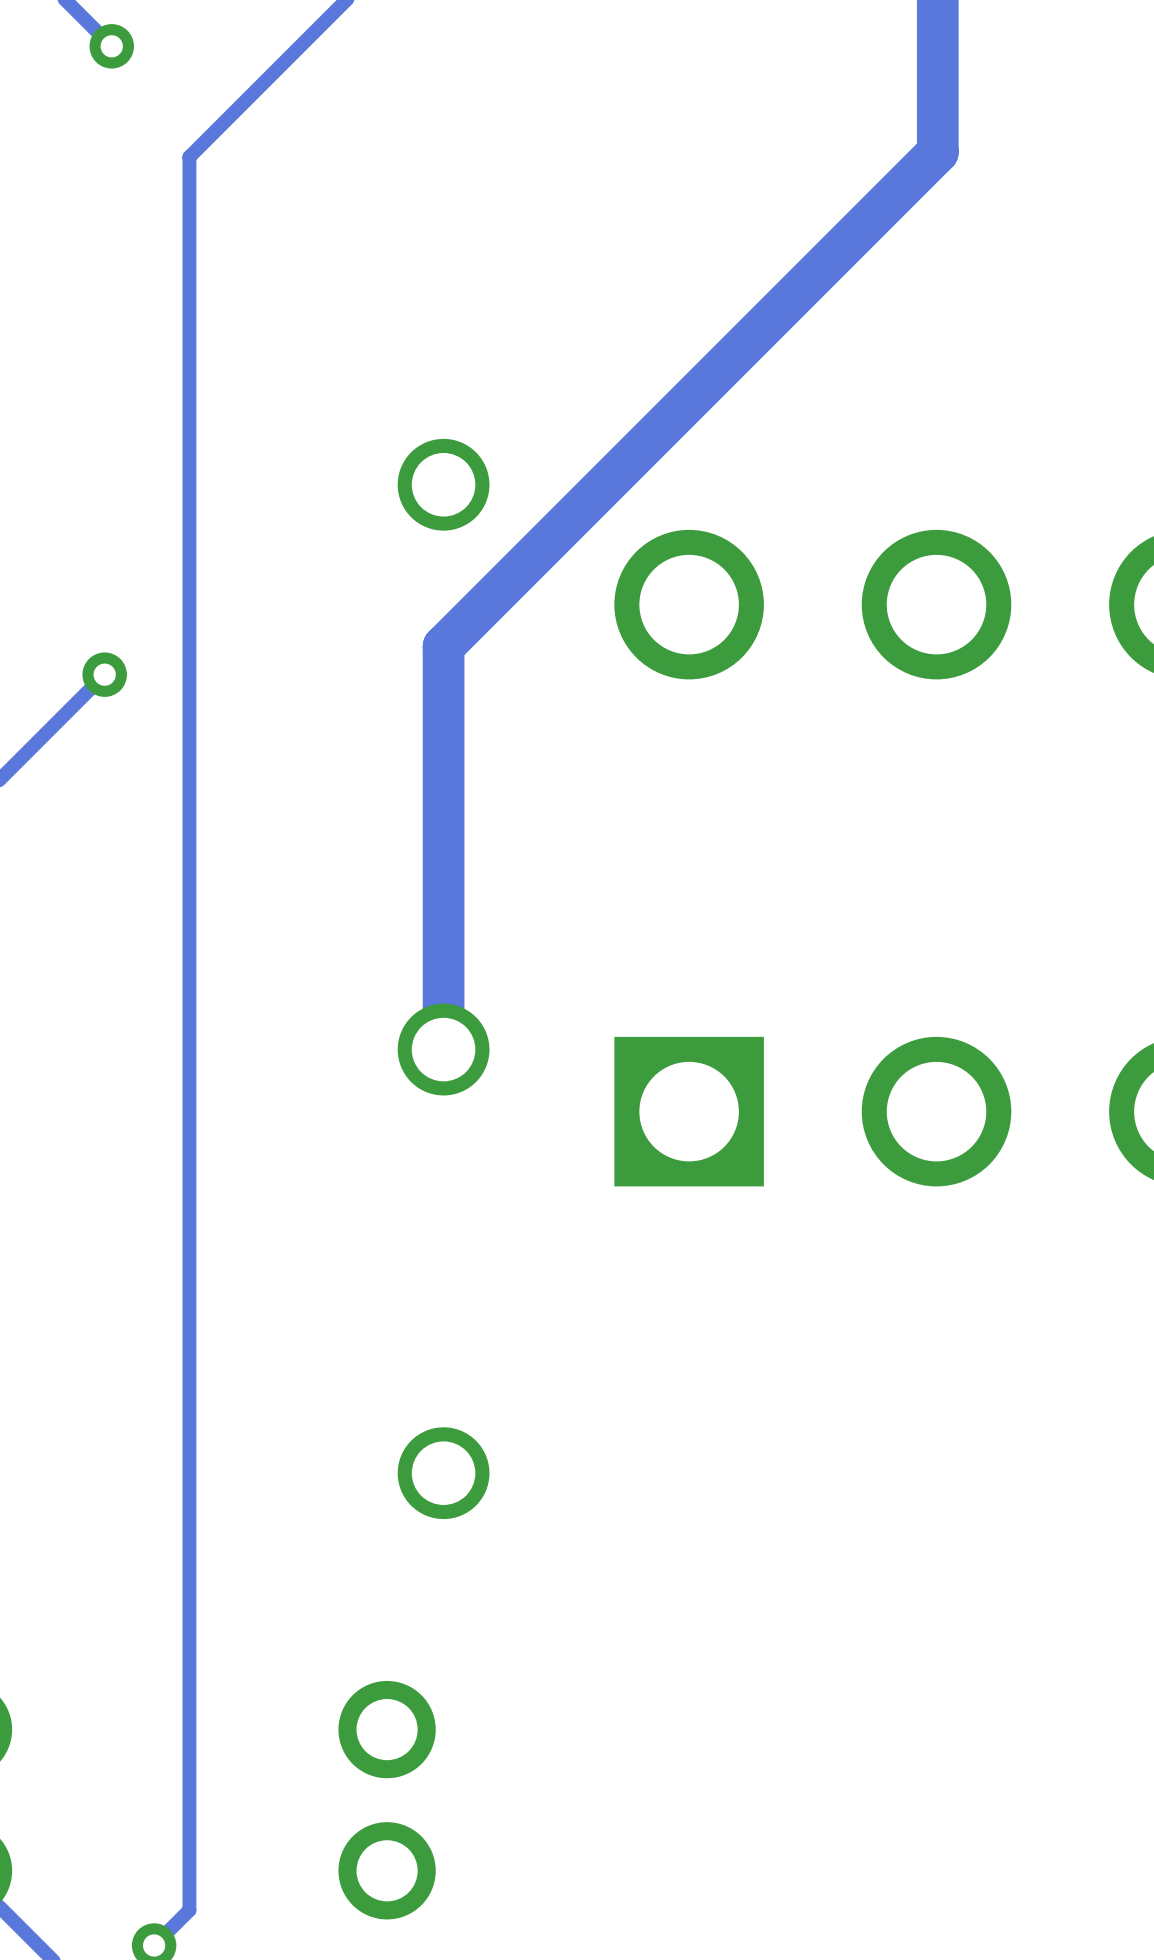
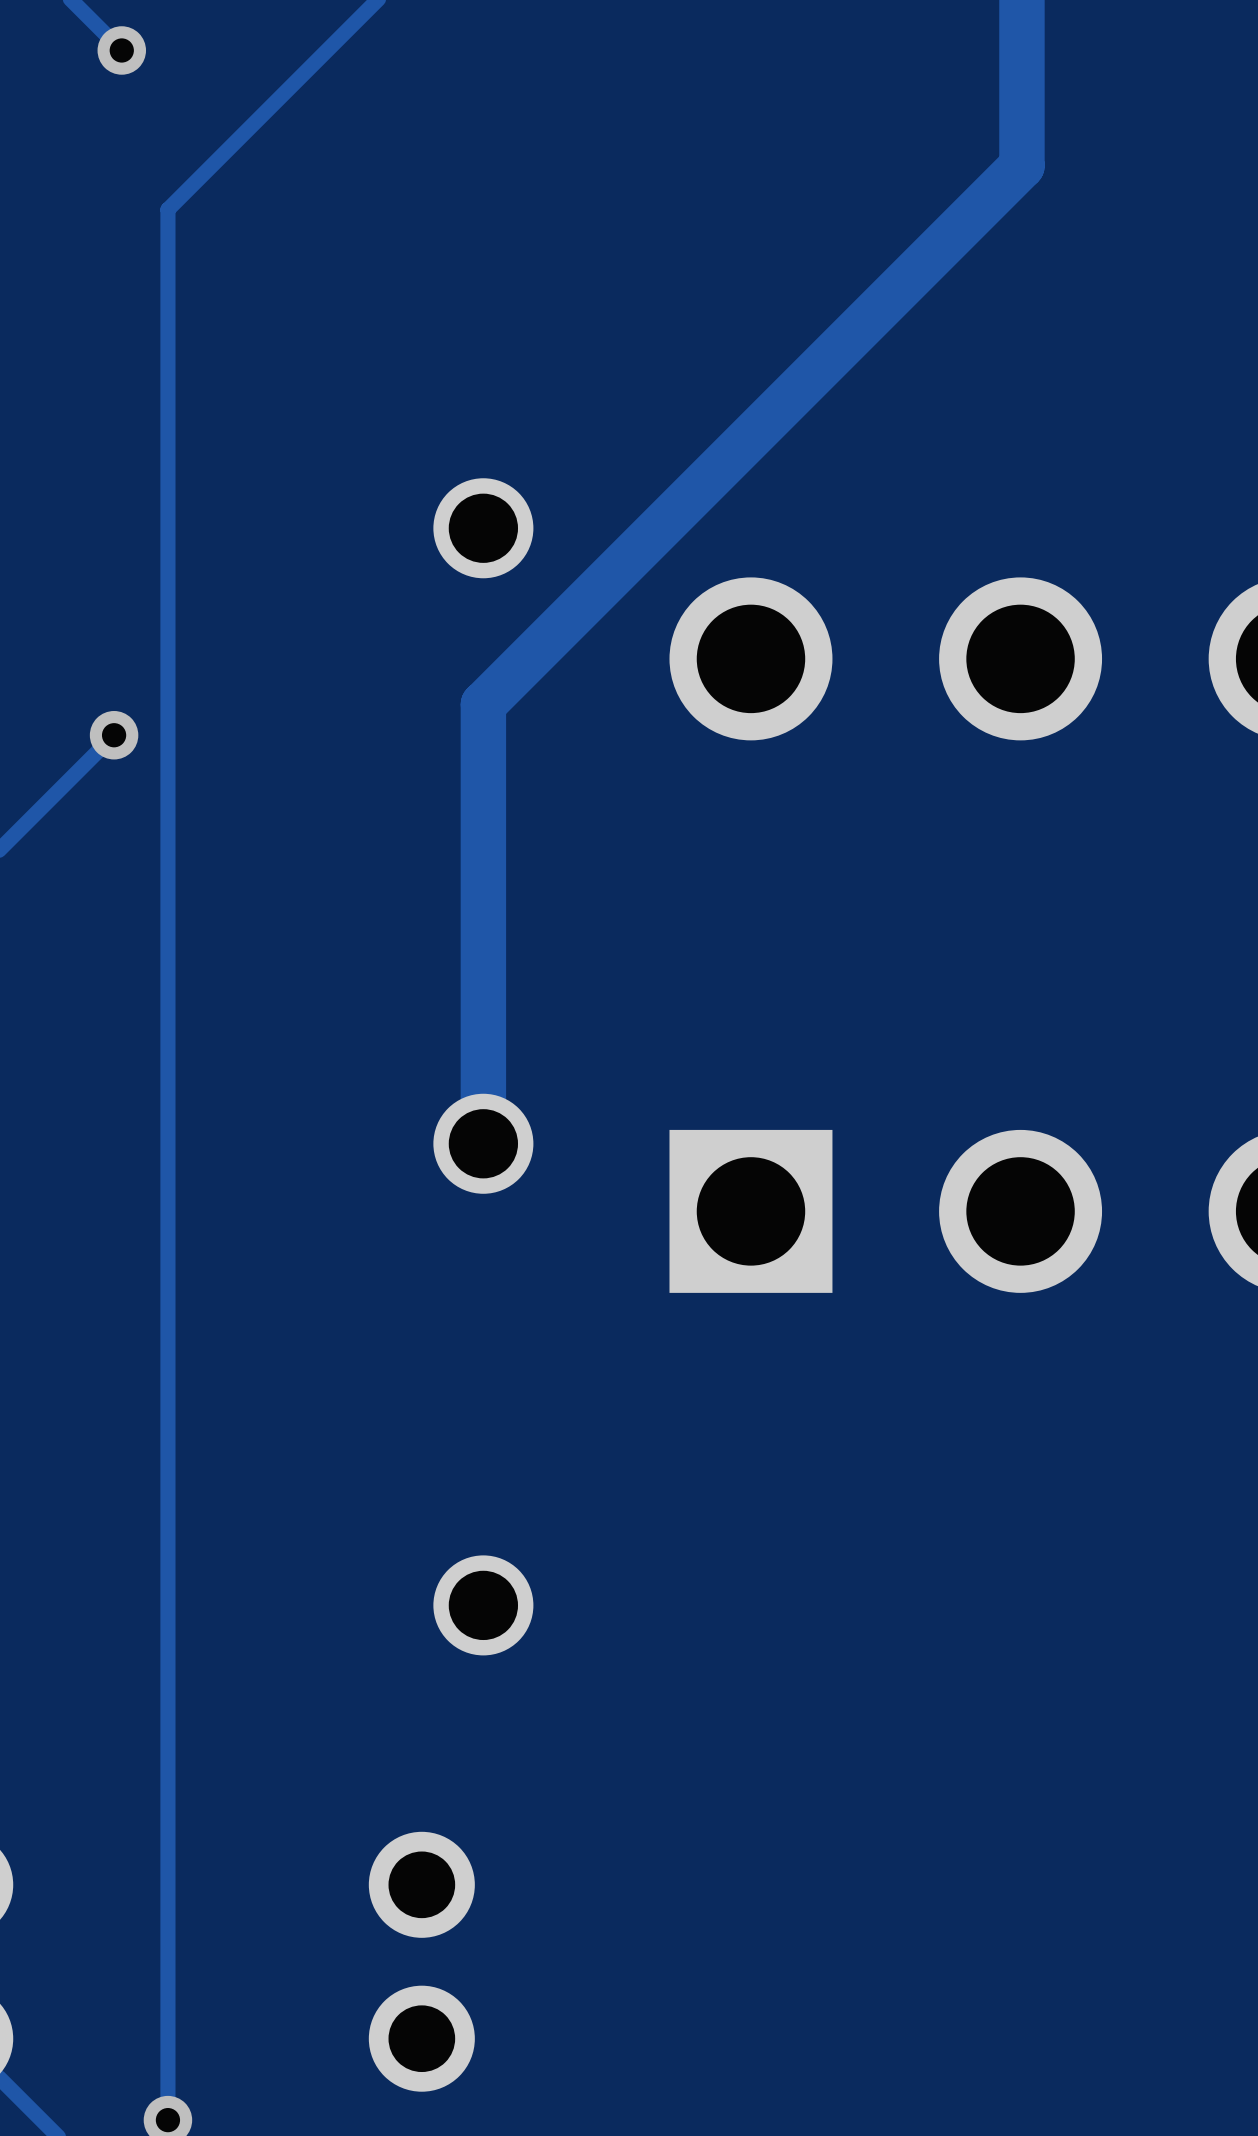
track: (189, 157) (189, 1910) (154, 1945) -> (206, 171) (167, 209) (167, 2120)

